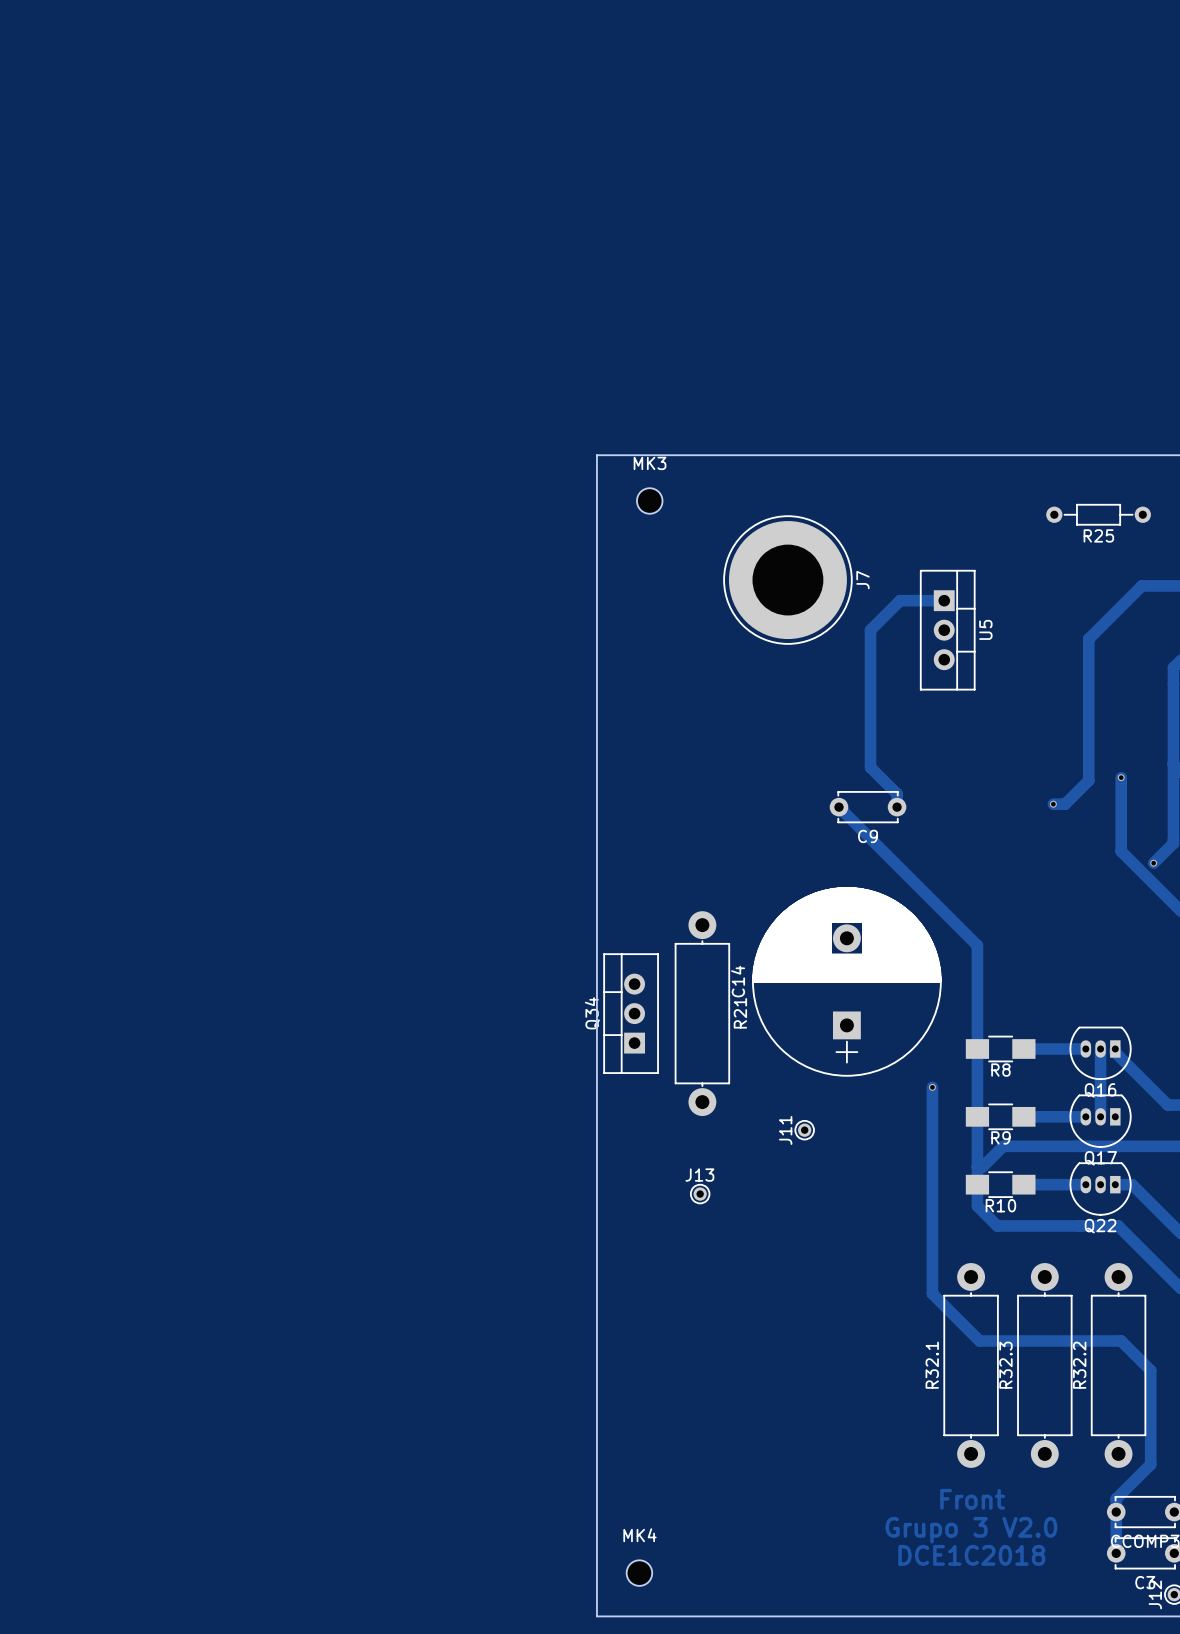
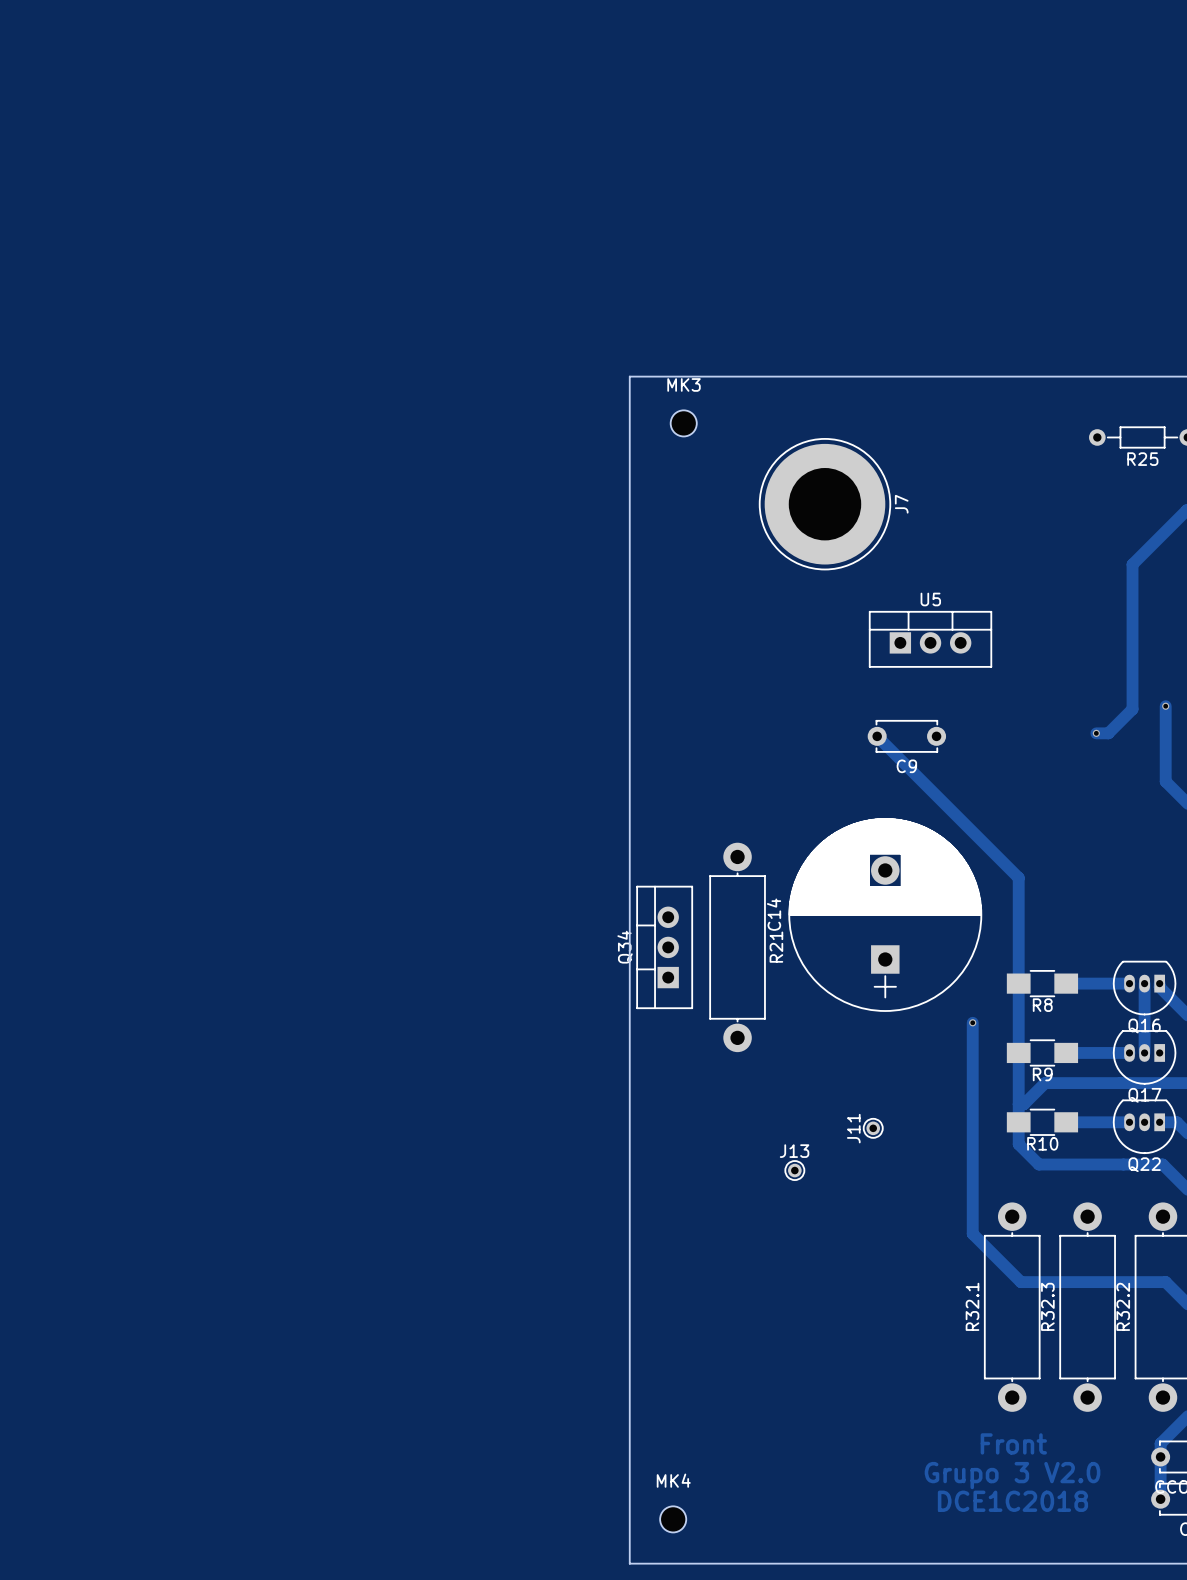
track: (944, 600) (900, 600) (870, 630) (870, 767) (897, 794) (897, 807) -> none
U5 rotation: 0° (947, 630) -> 90° counterclockwise (930, 639)
U5 position: (947, 630) -> (930, 639)
J11 position: (804, 1130) -> (873, 1128)
J13 position: (700, 1194) -> (794, 1170)

